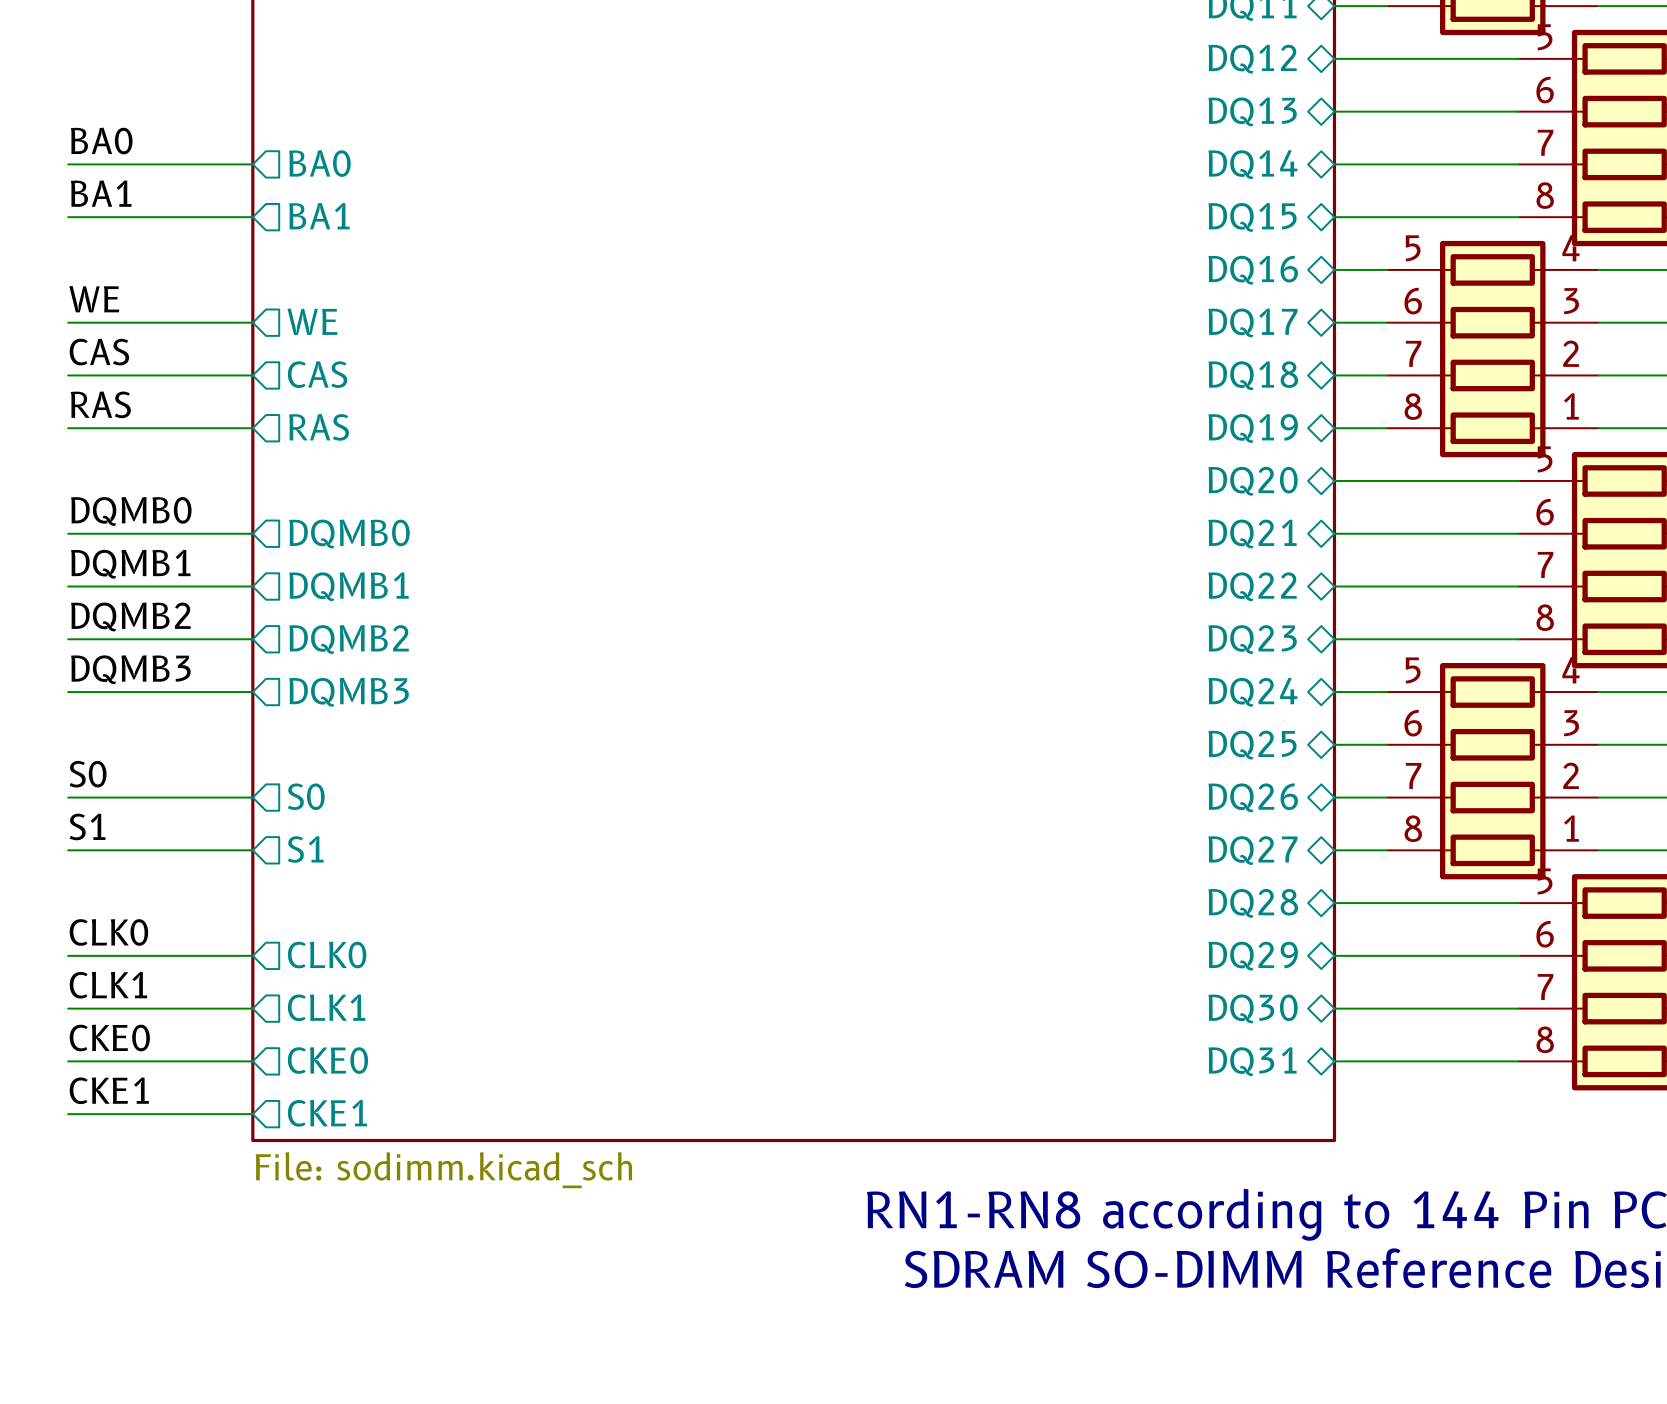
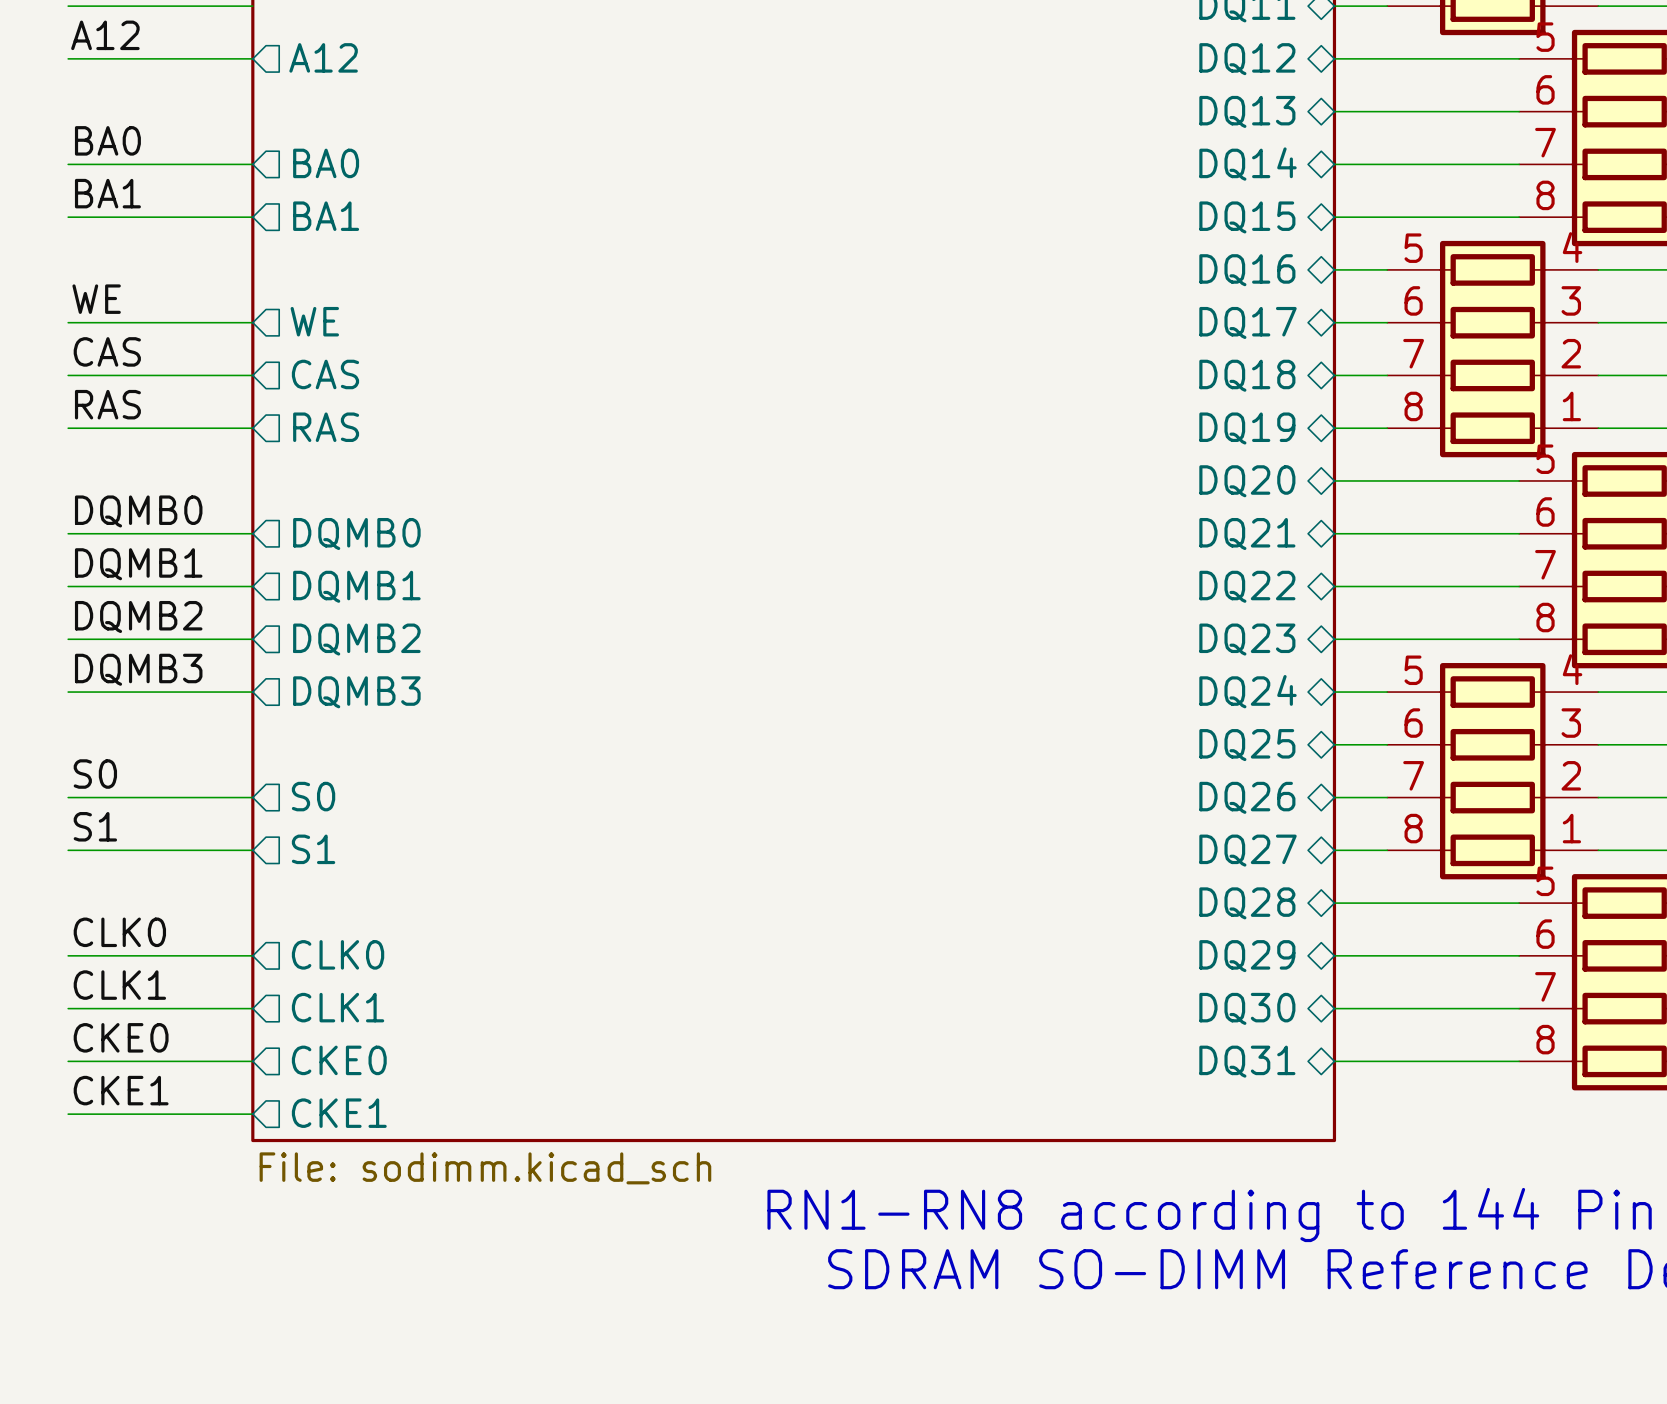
wire: none -> (68, 6) (252, 6)
label: none -> A12 (105, 35)
sheet pin: none -> A12 (323, 57)
wire: none -> (68, 58) (252, 58)

